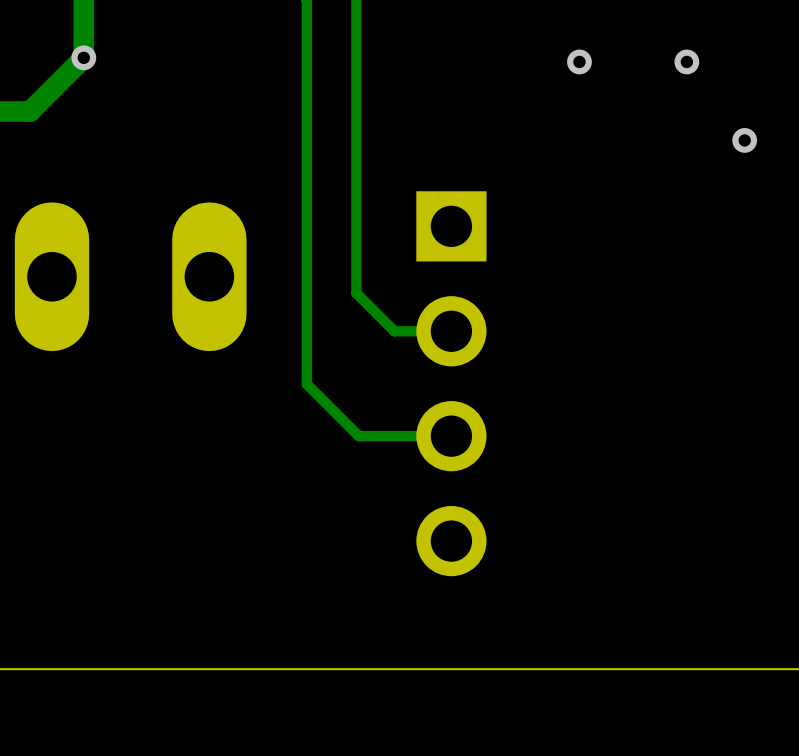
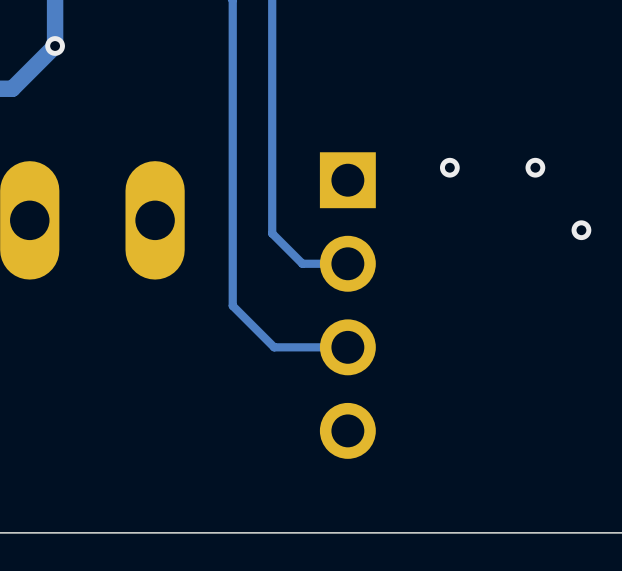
via: (579, 61) -> none
via: (686, 61) -> none
via: (744, 140) -> none
via: none -> (449, 167)
via: none -> (535, 167)
via: none -> (581, 230)

